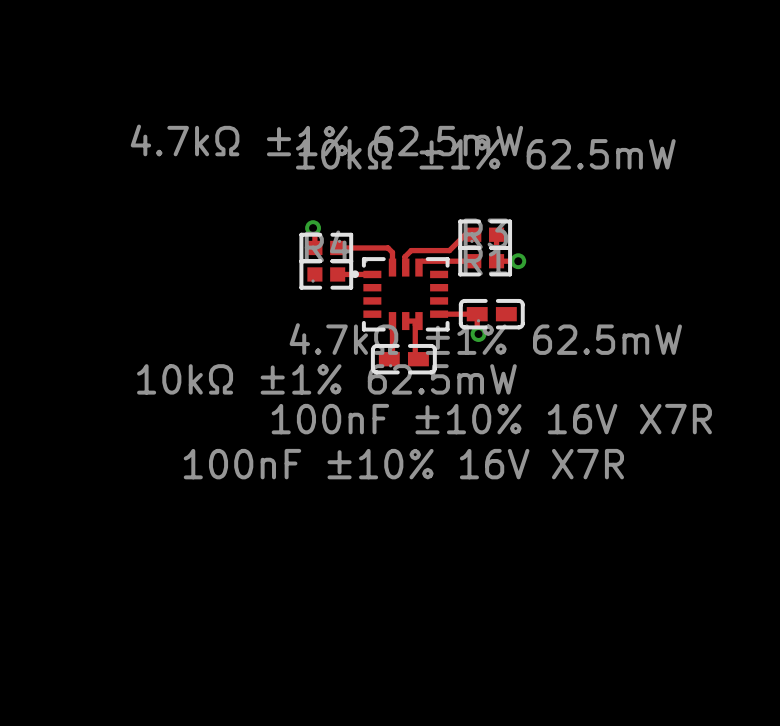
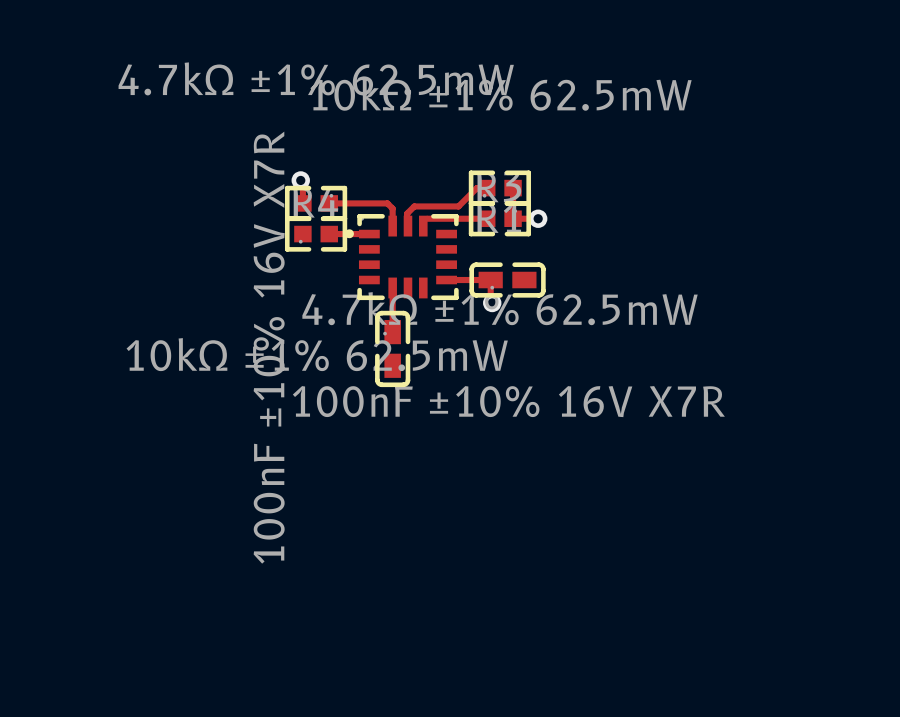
top track: (405, 321) (418, 321) (415, 324) (415, 359) -> none
part rotation: 0° (403, 359) -> 90° clockwise (392, 348)

